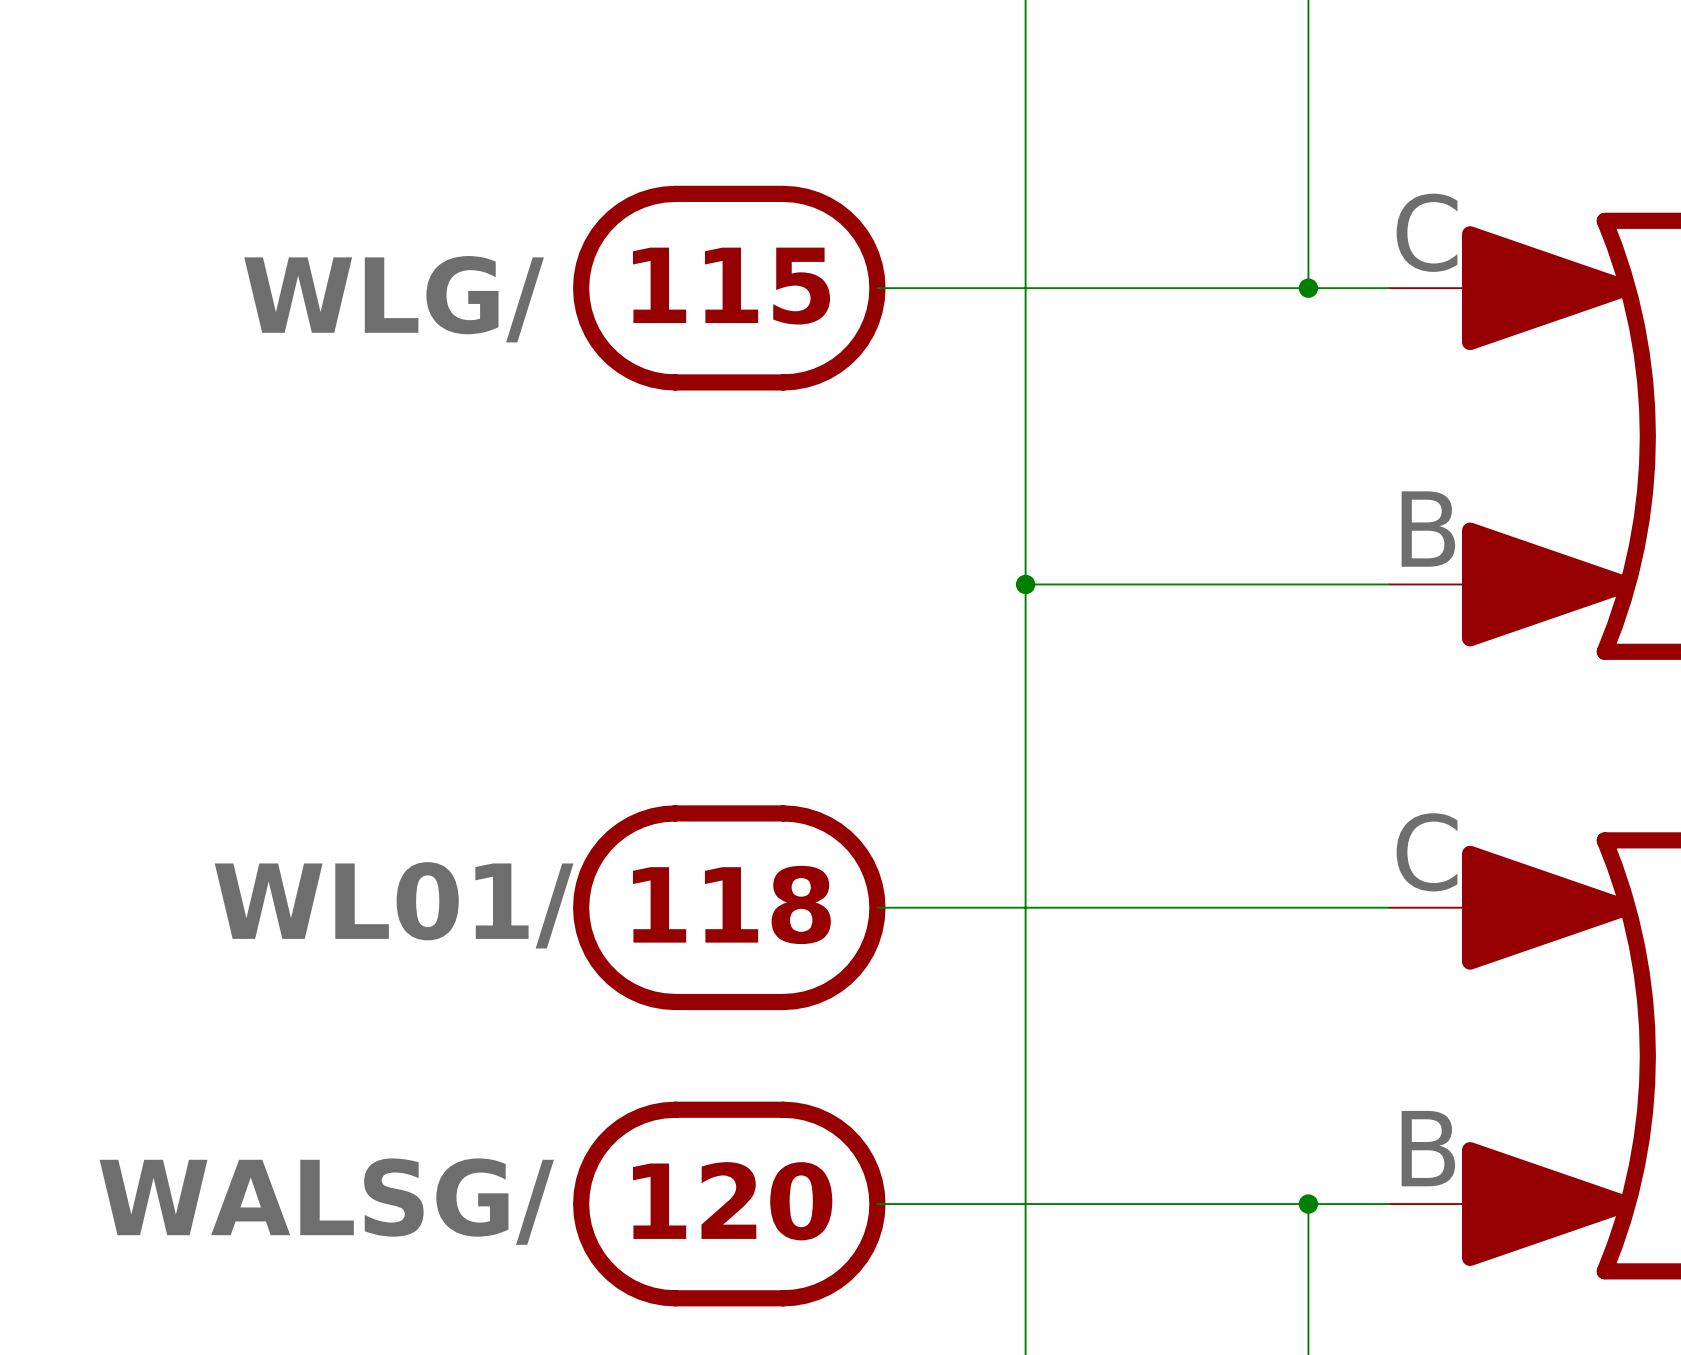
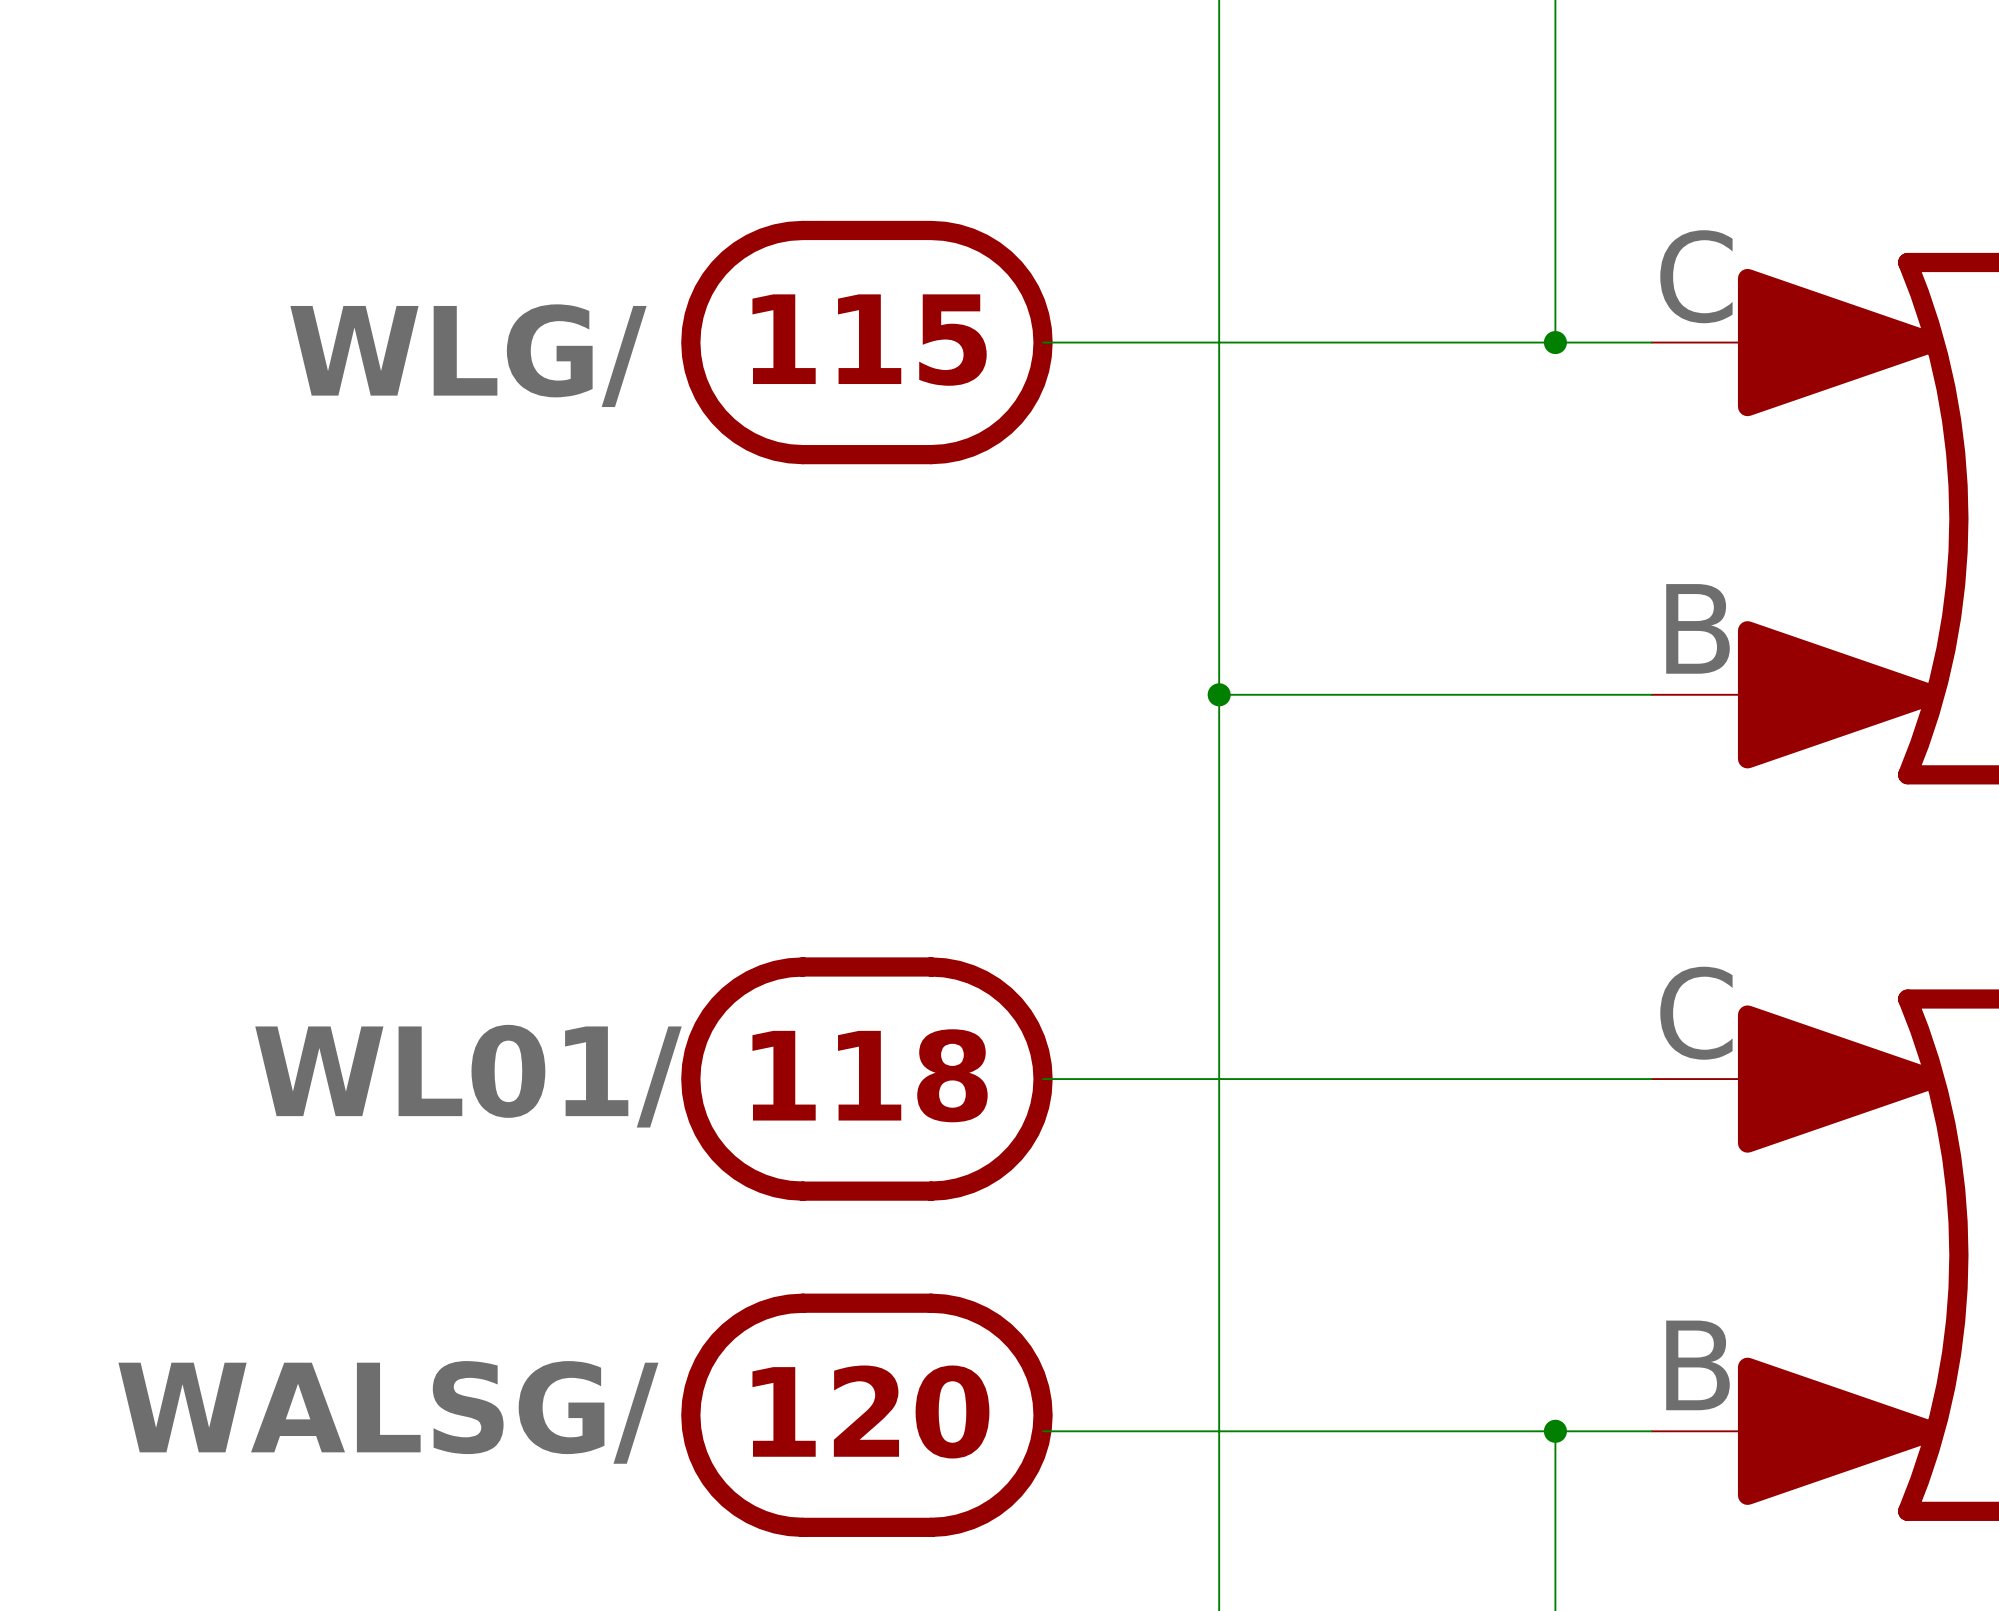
part position: (729, 1204) -> (866, 1415)

